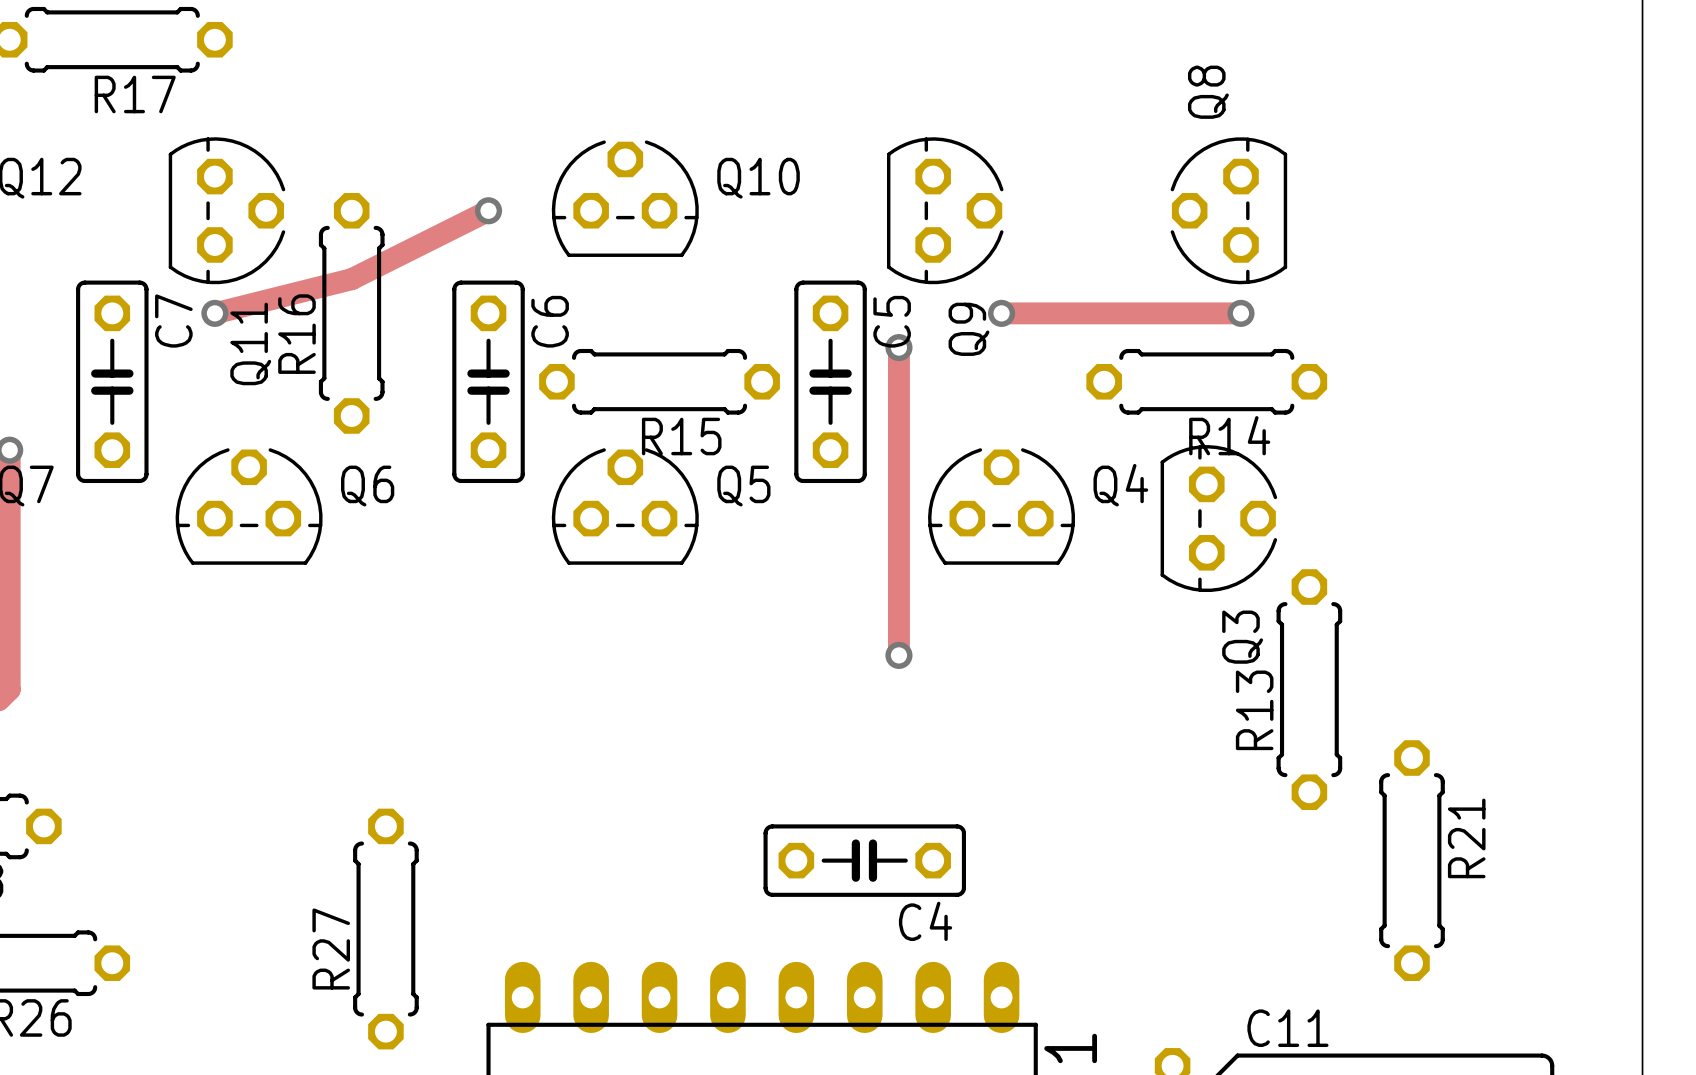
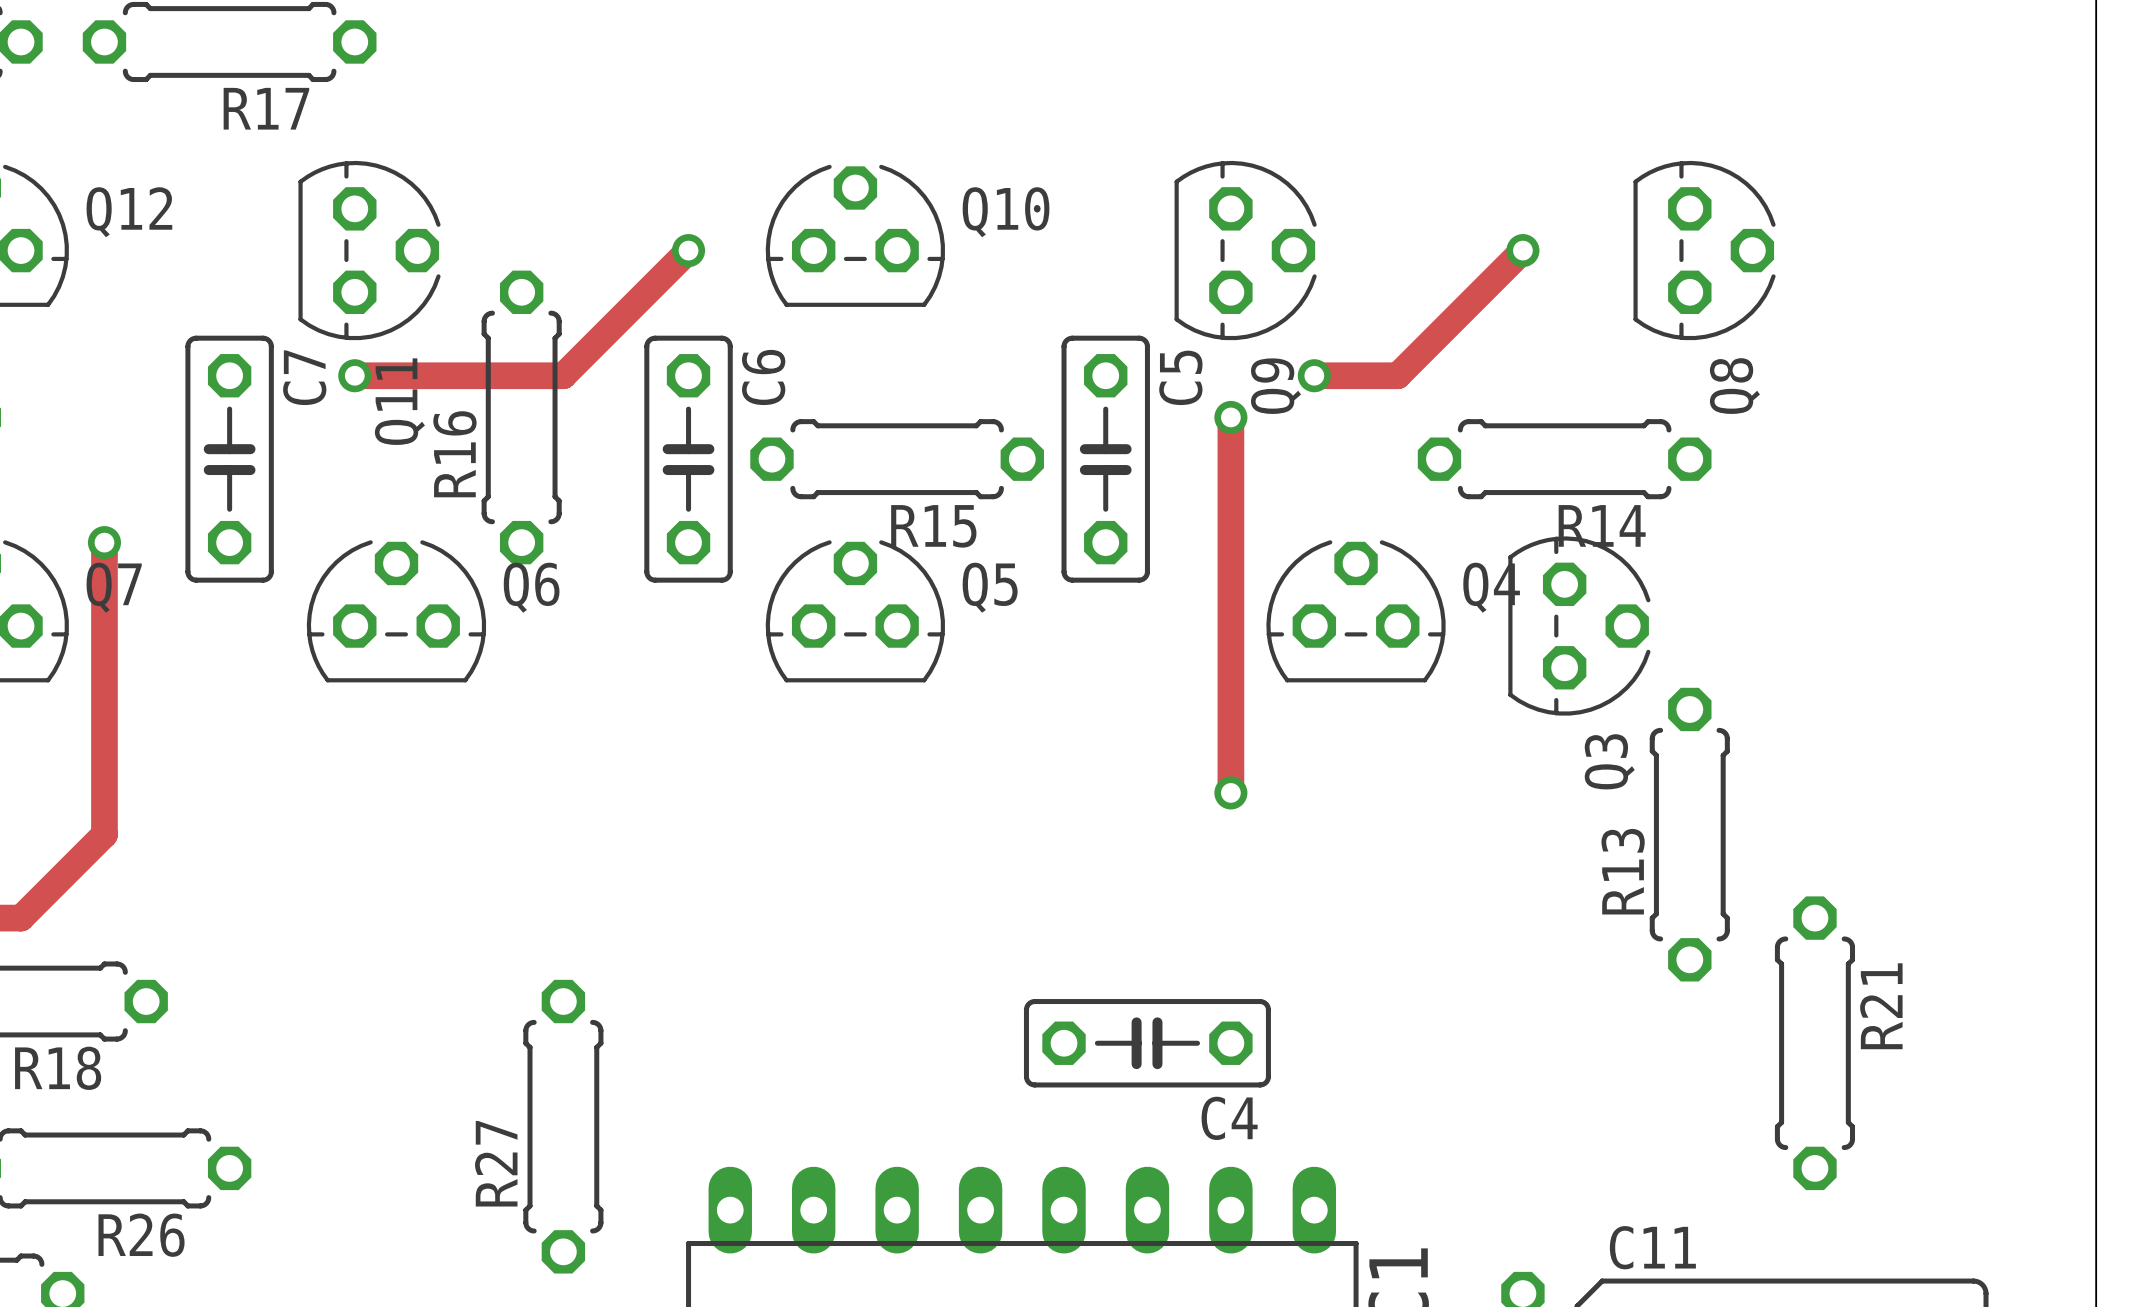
track: (488, 210) (351, 279) (214, 313) -> (688, 250) (563, 375) (354, 375)
Q8 rotation: 0° (1228, 210) -> 180° (1704, 250)
Q8 position: (1228, 210) -> (1704, 250)
R16 position: (351, 313) -> (521, 417)
track: (1069, 313) (1240, 313) -> (1397, 375) (1522, 250)
via position: (1240, 313) -> (1522, 250)
track: (898, 347) (898, 655) -> (1230, 417) (1230, 792)
via position: (898, 347) -> (1230, 417)
Q4 position: (1001, 506) -> (1355, 611)
via position: (898, 655) -> (1230, 792)

